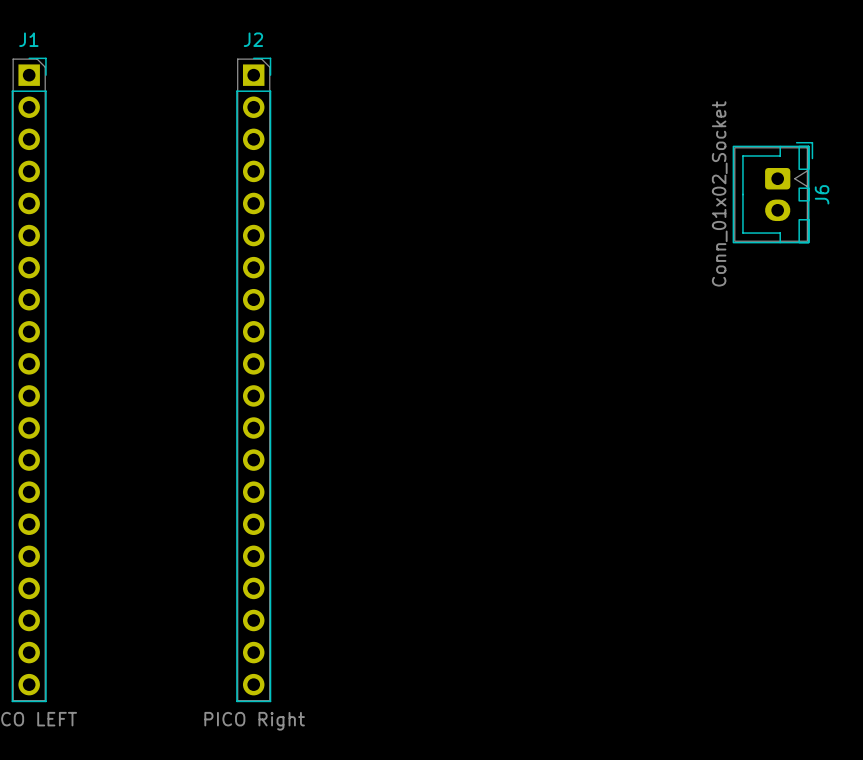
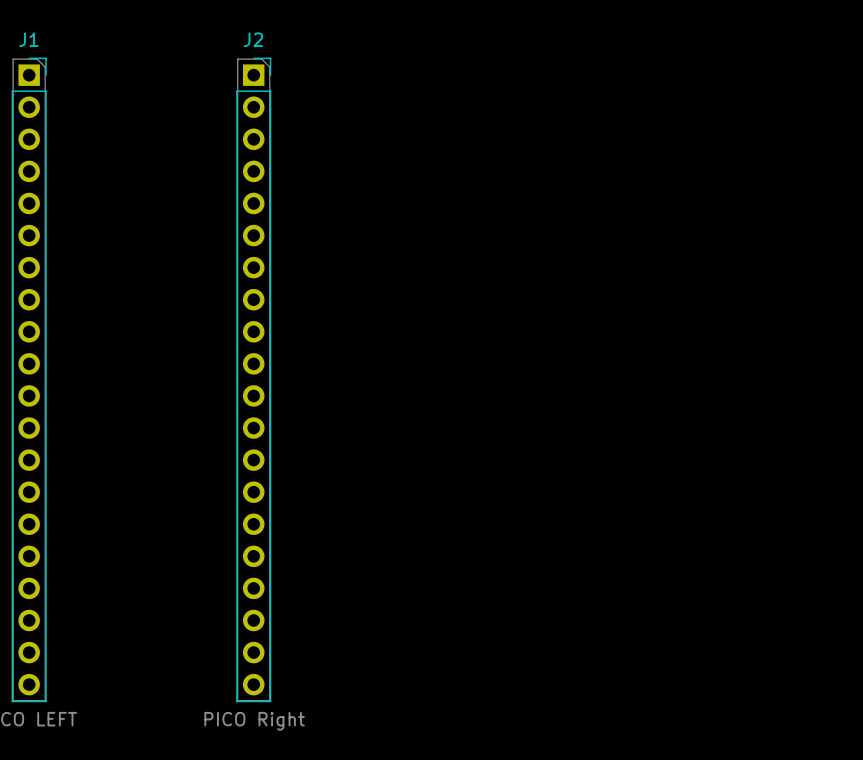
J6: Conn_01x02_Socket (772, 192) -> none

